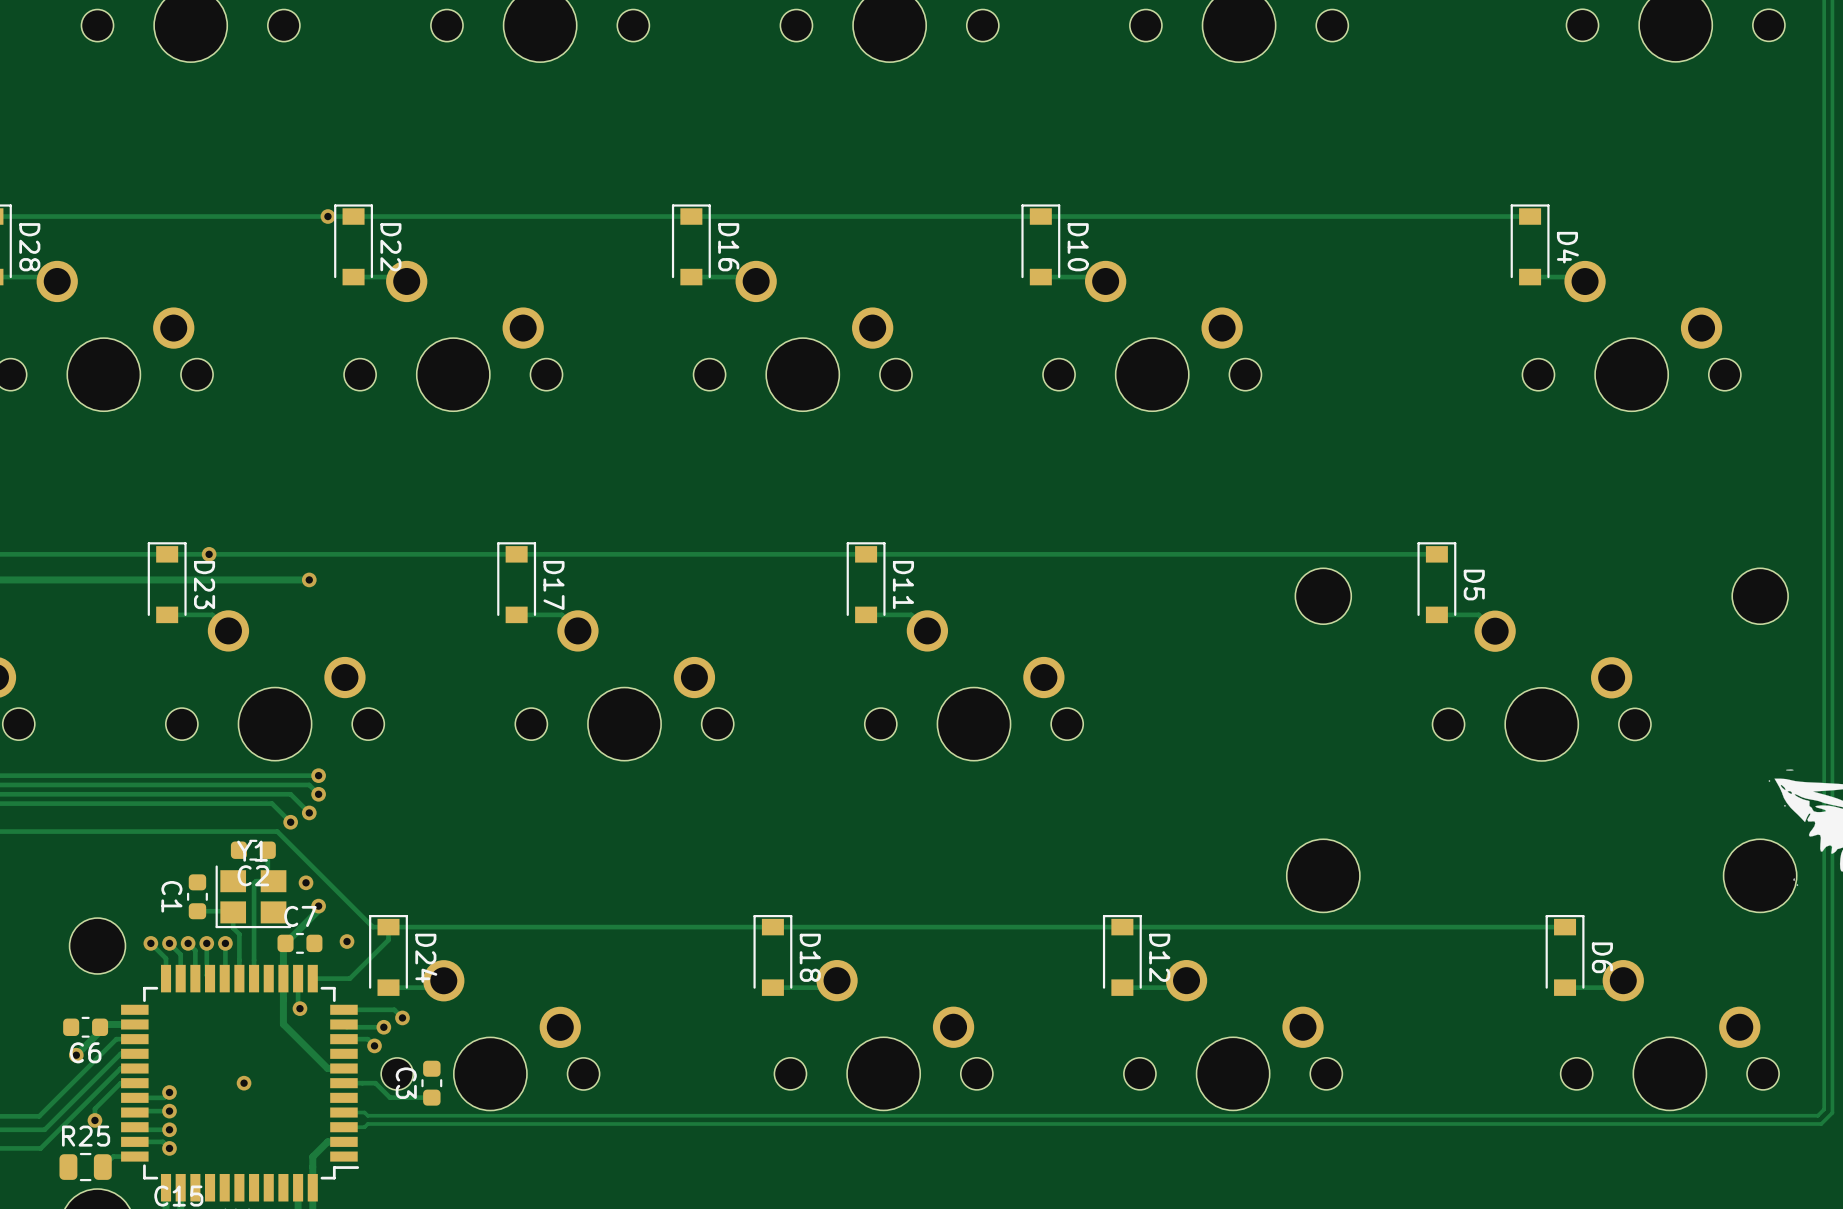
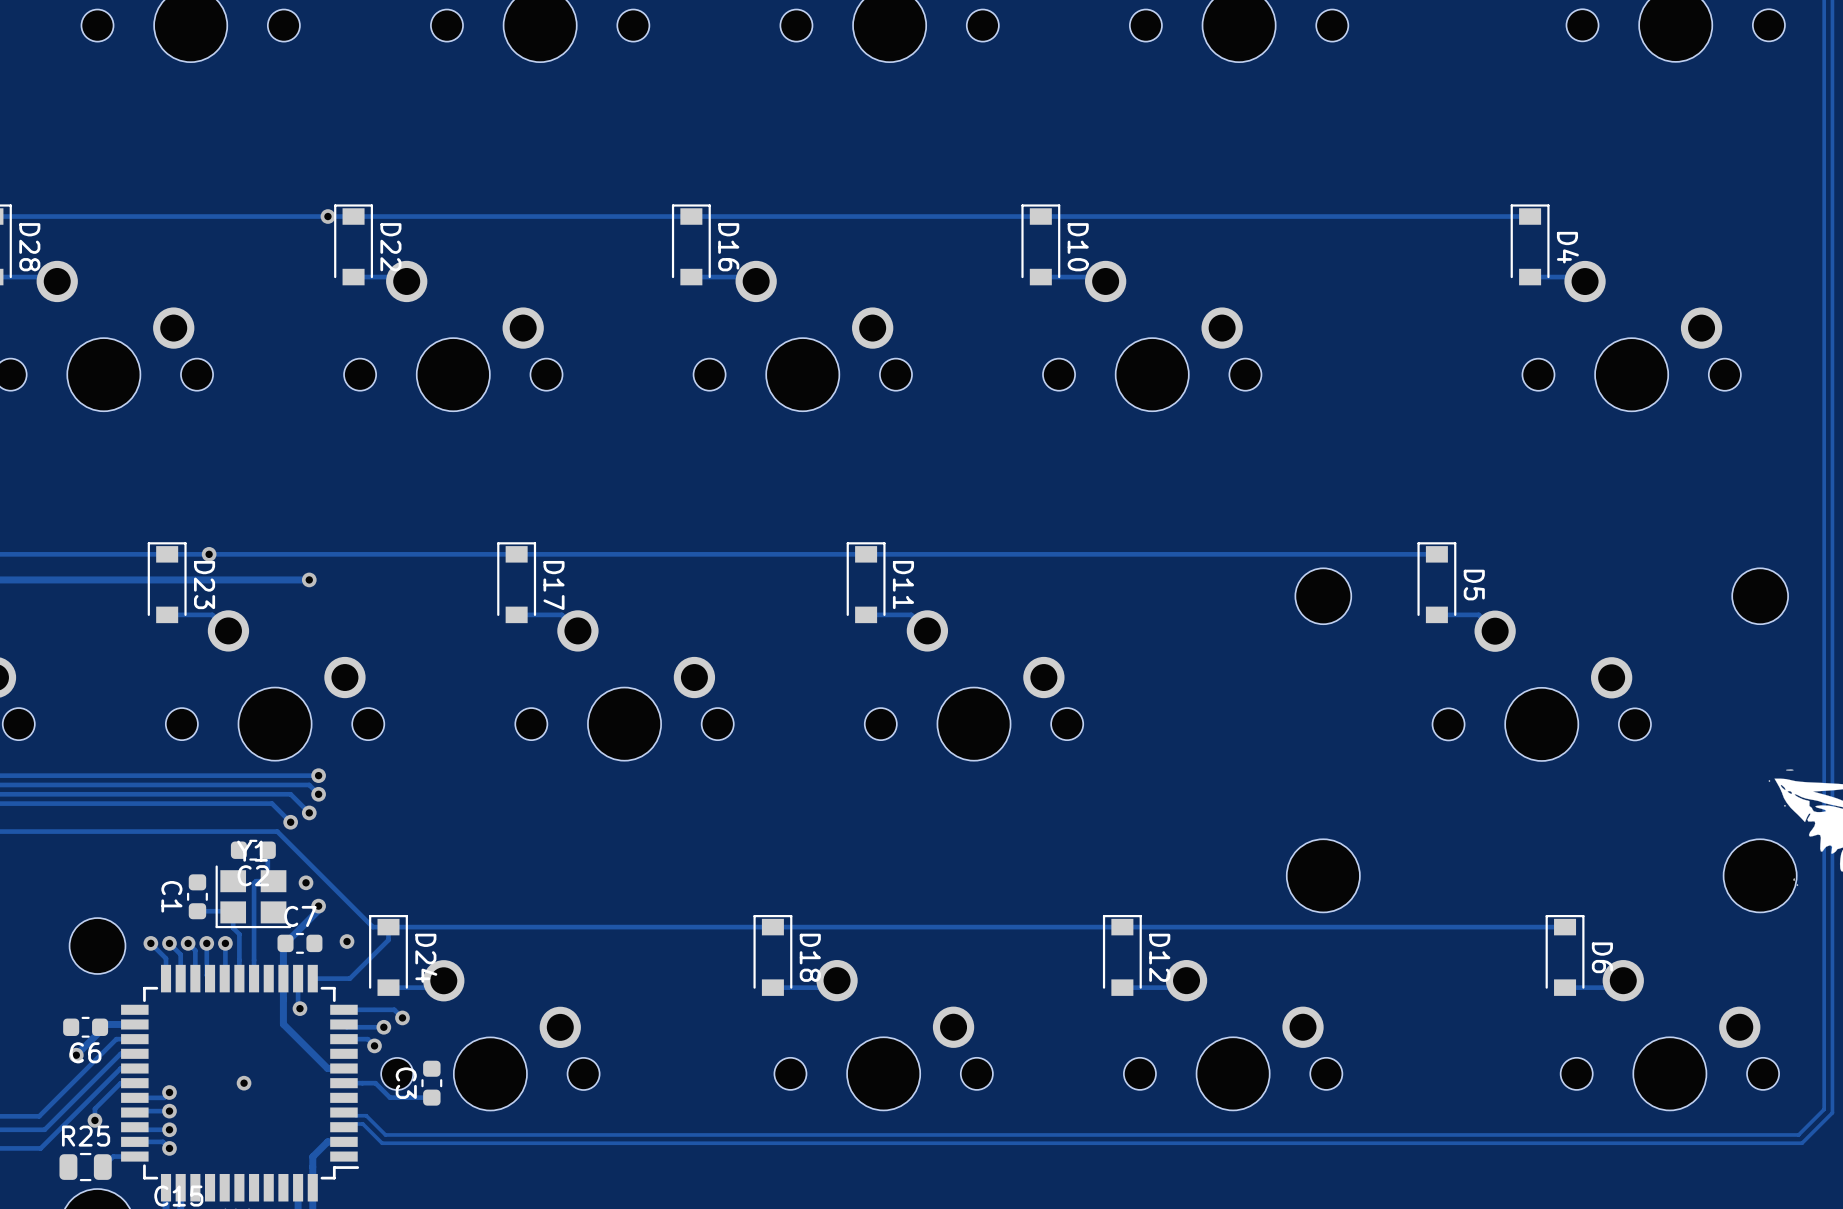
track: (352, 1112) (364, 1112) (367, 1115) (1817, 1115) -> (352, 1112) (355, 1115) (366, 1115) (385, 1134) (1798, 1134) (1817, 1115)
track: (1821, 1123) (367, 1123) (364, 1127) (352, 1127) -> (1821, 1123) (1802, 1143) (382, 1143) (362, 1123) (355, 1123) (352, 1127)

